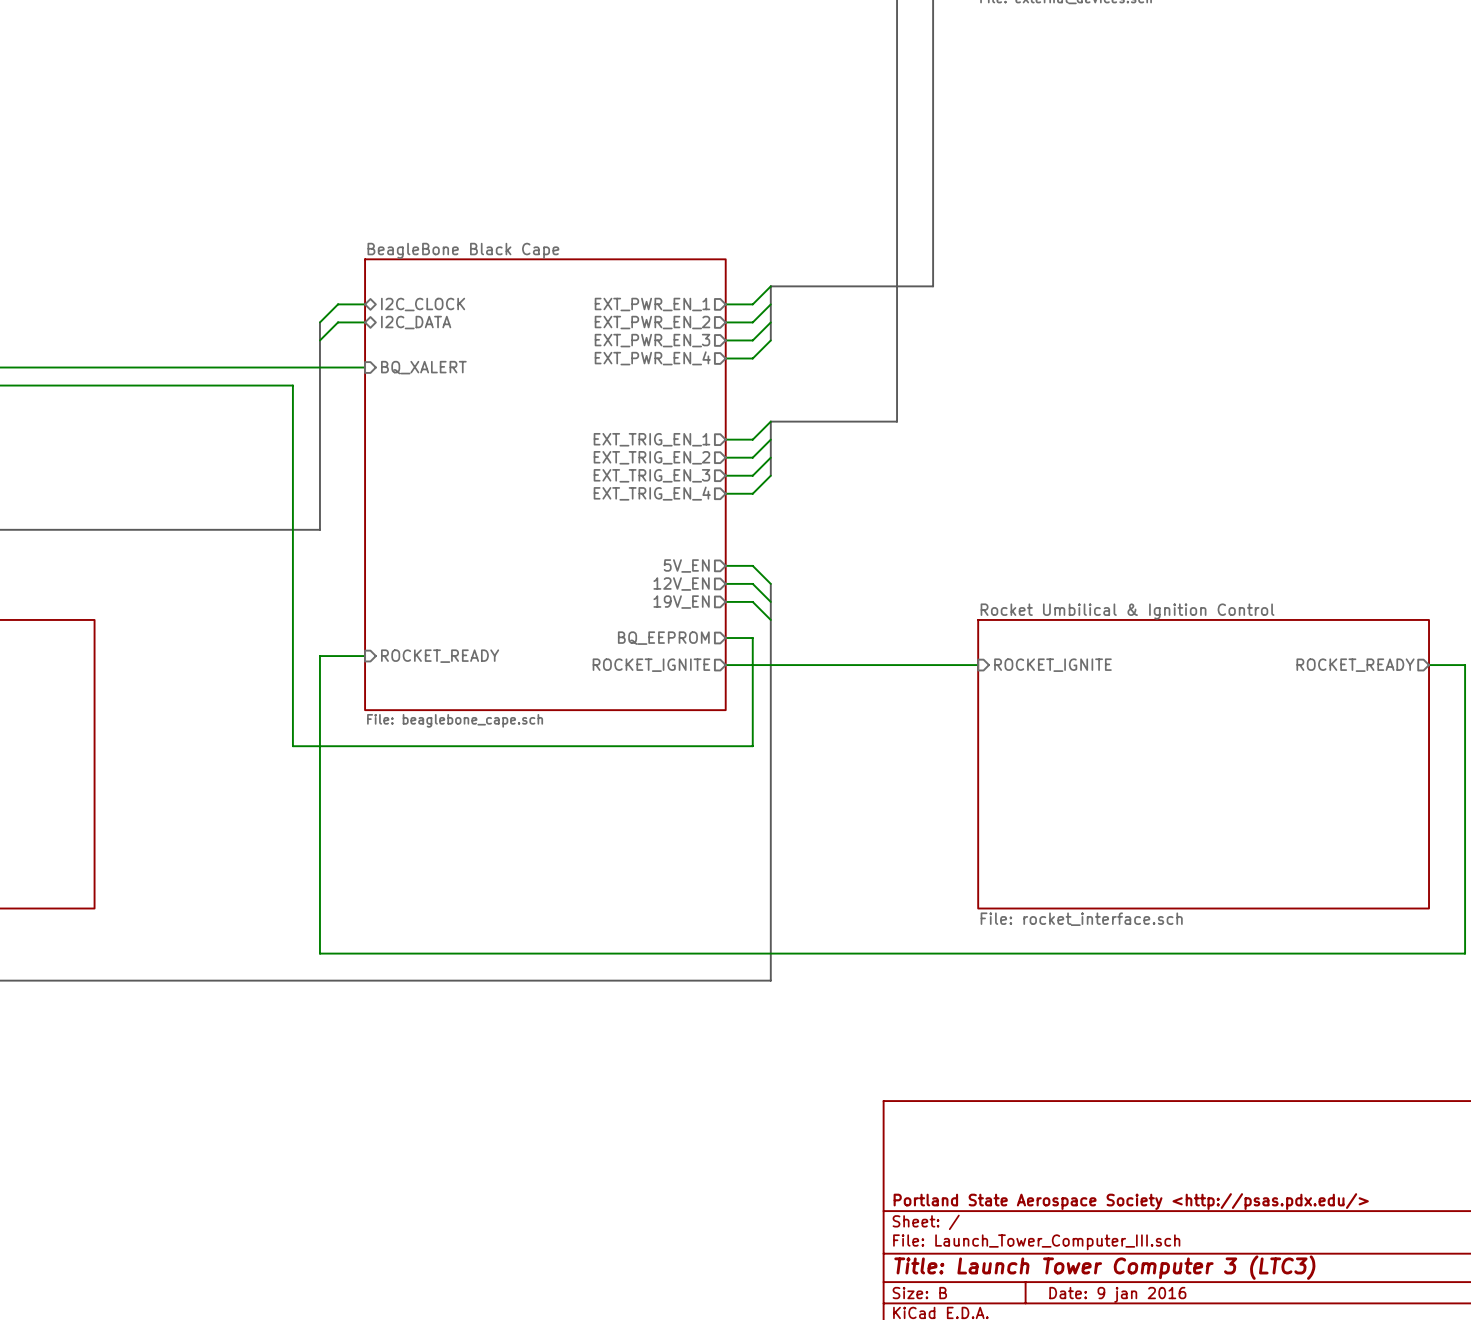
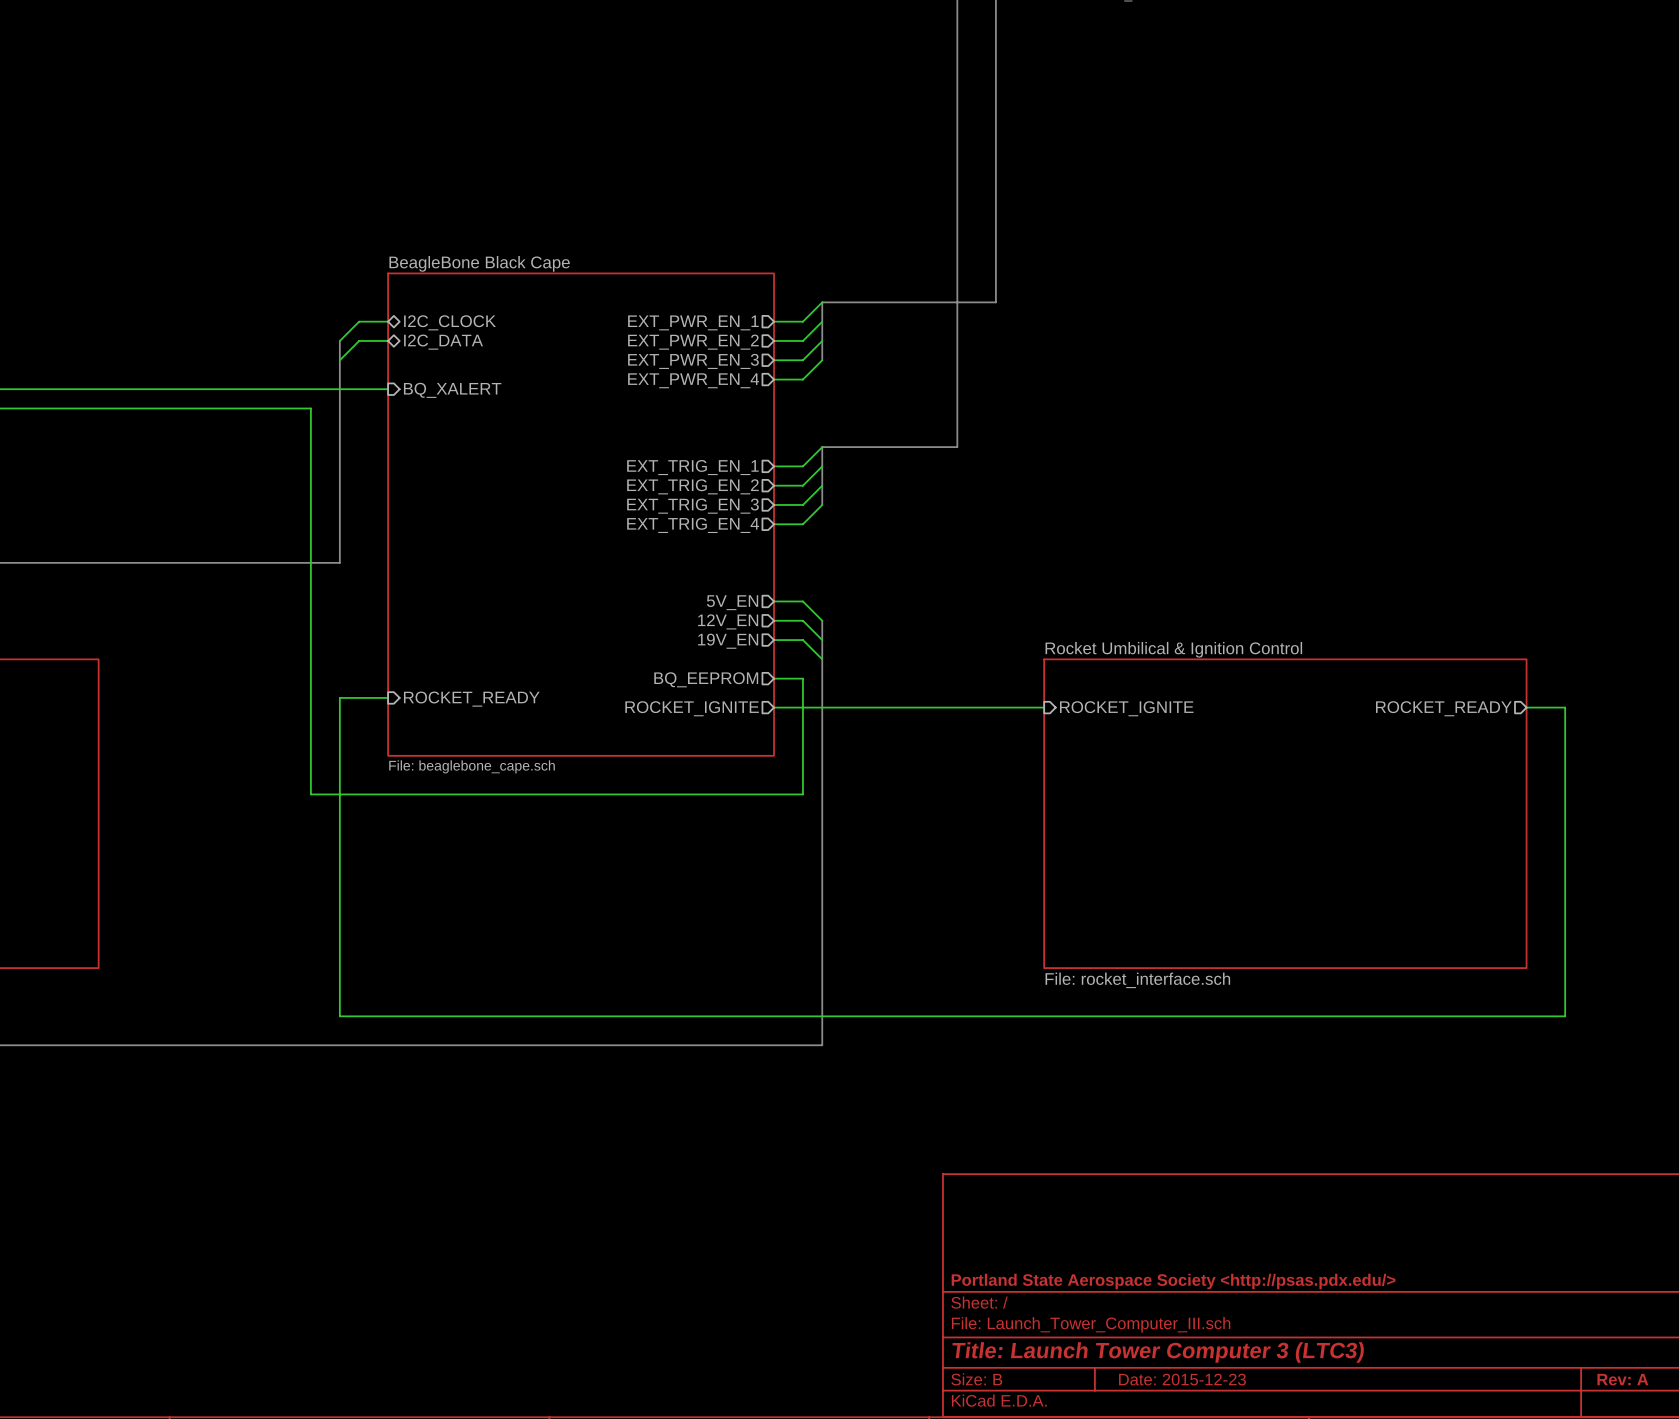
title block: Date: 9 jan 2016 (1117, 1294) -> Date: 2015-12-23 (1182, 1379)

